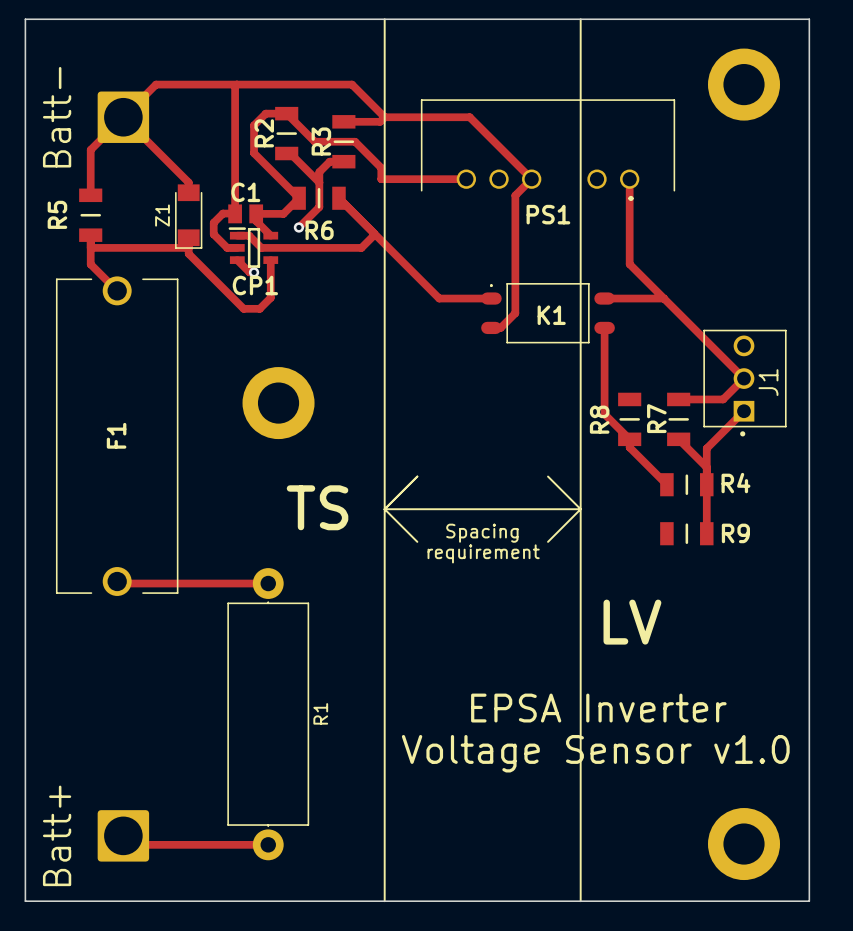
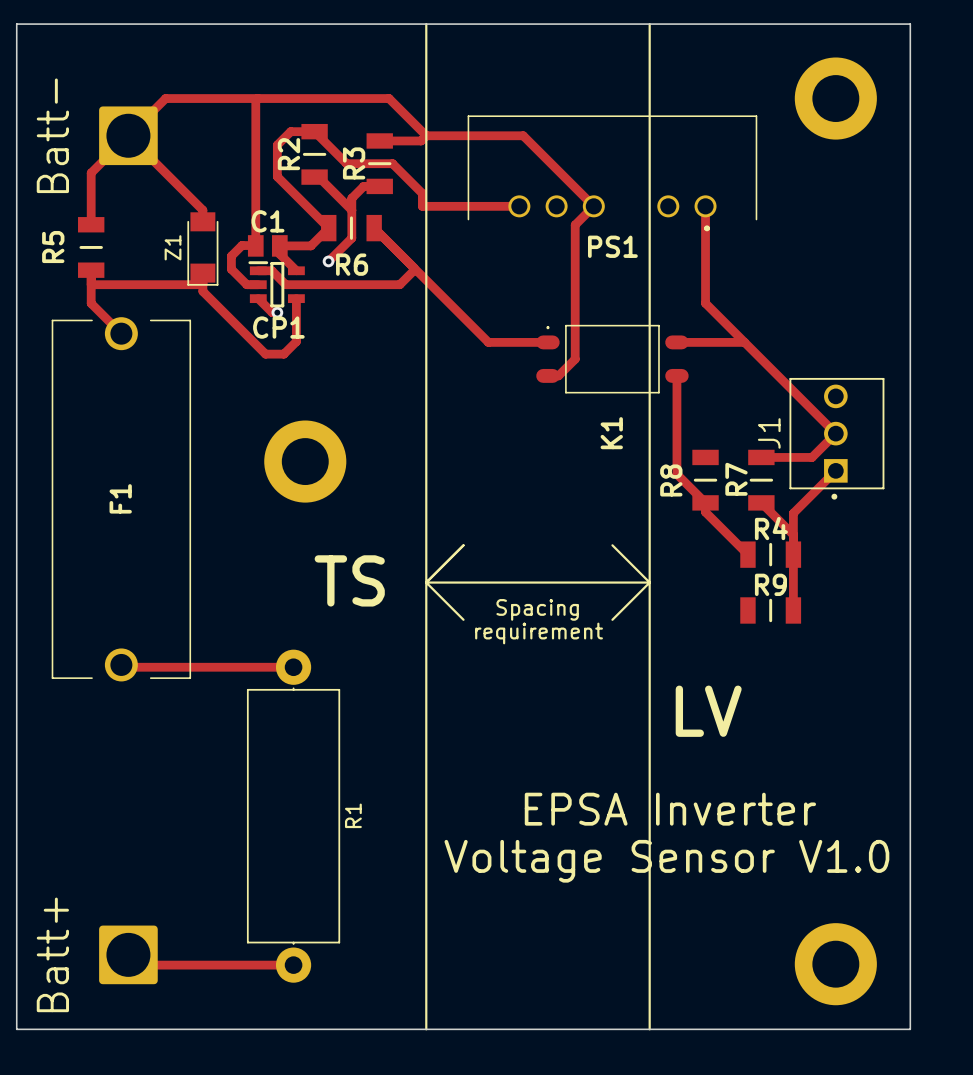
K1 name rotation: 0° (551, 315) -> 90° counterclockwise (611, 433)
K1 name position: K1 (551, 315) -> K1 (611, 433)
J1 name position: J1 (768, 382) -> J1 (769, 433)
R4 name position: R4 (735, 483) -> R4 (771, 528)
R9 name position: R9 (735, 533) -> R9 (770, 584)
text: Voltage Sensor v1.0 (595, 753) -> Voltage Sensor V1.0 (666, 861)

